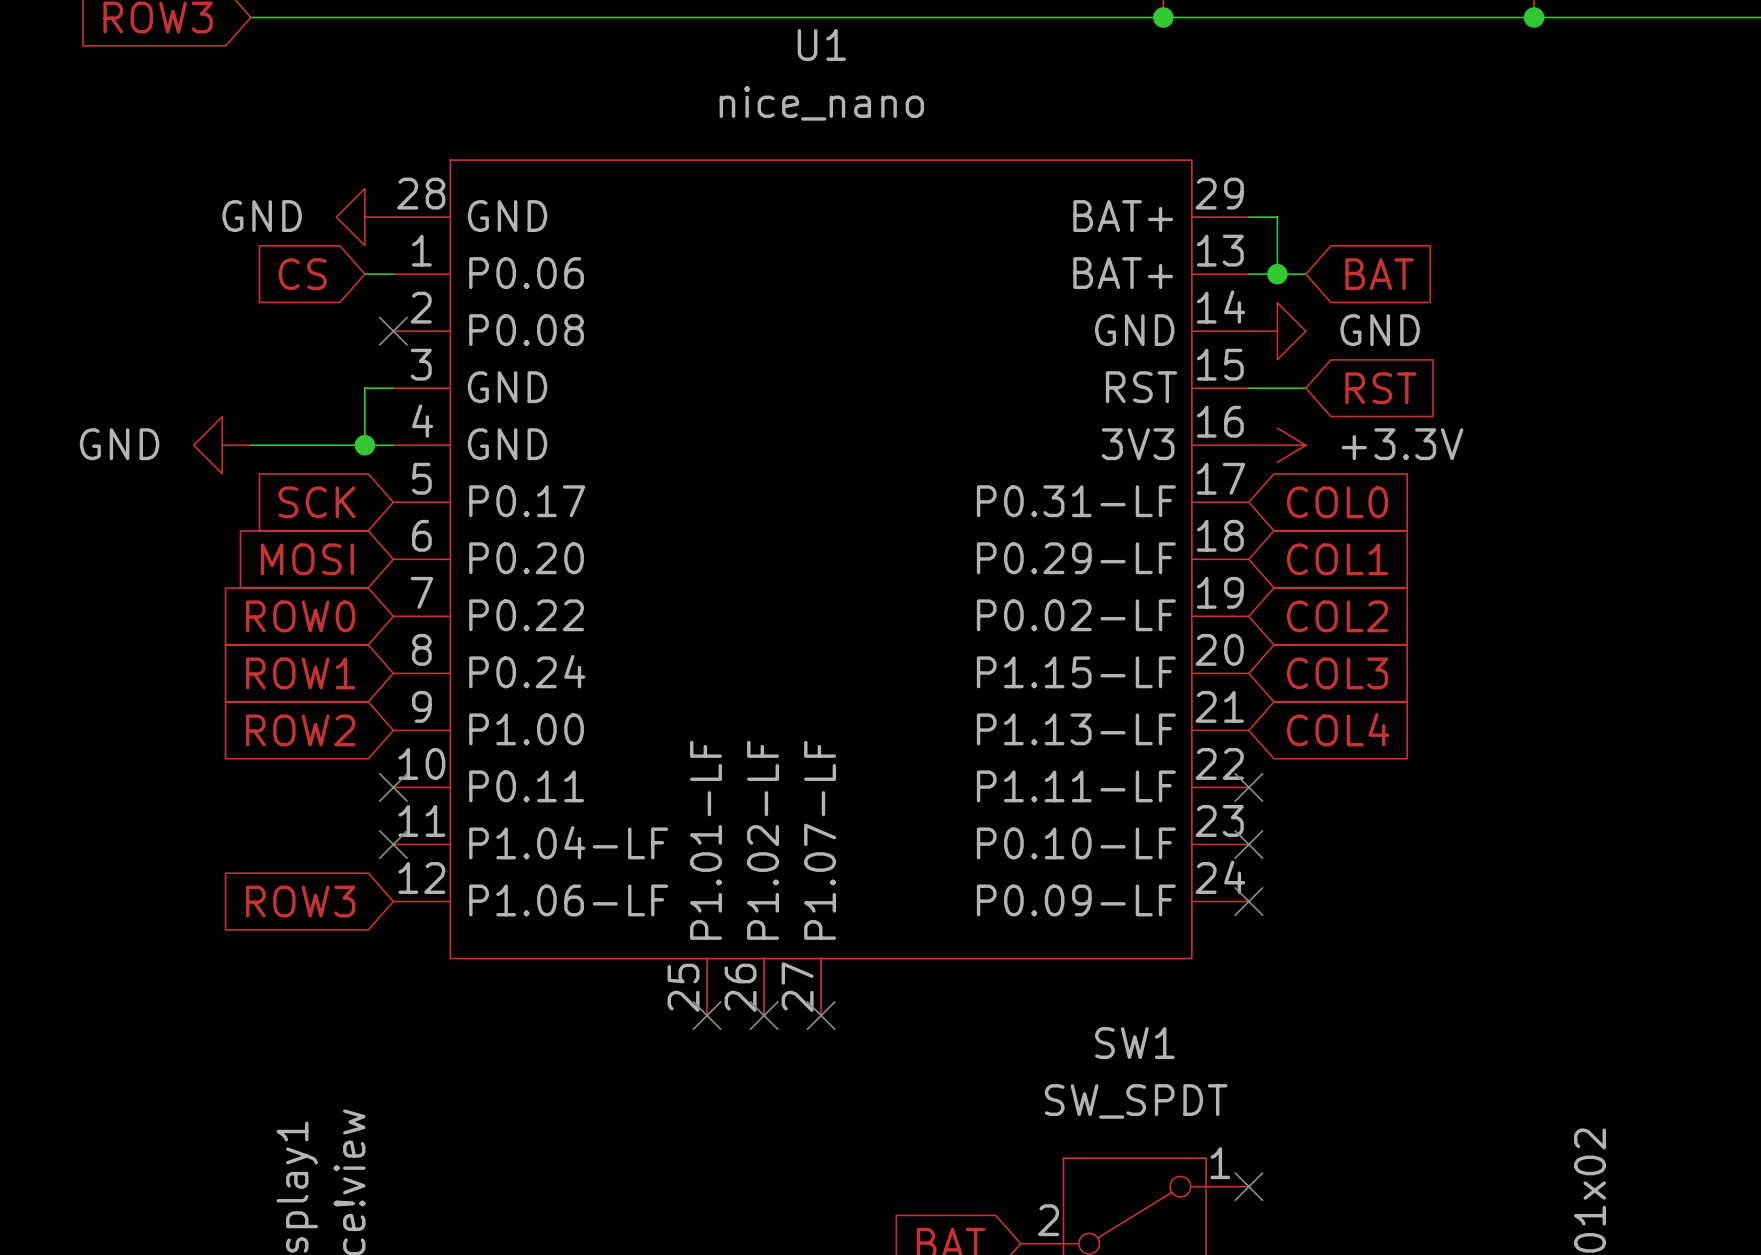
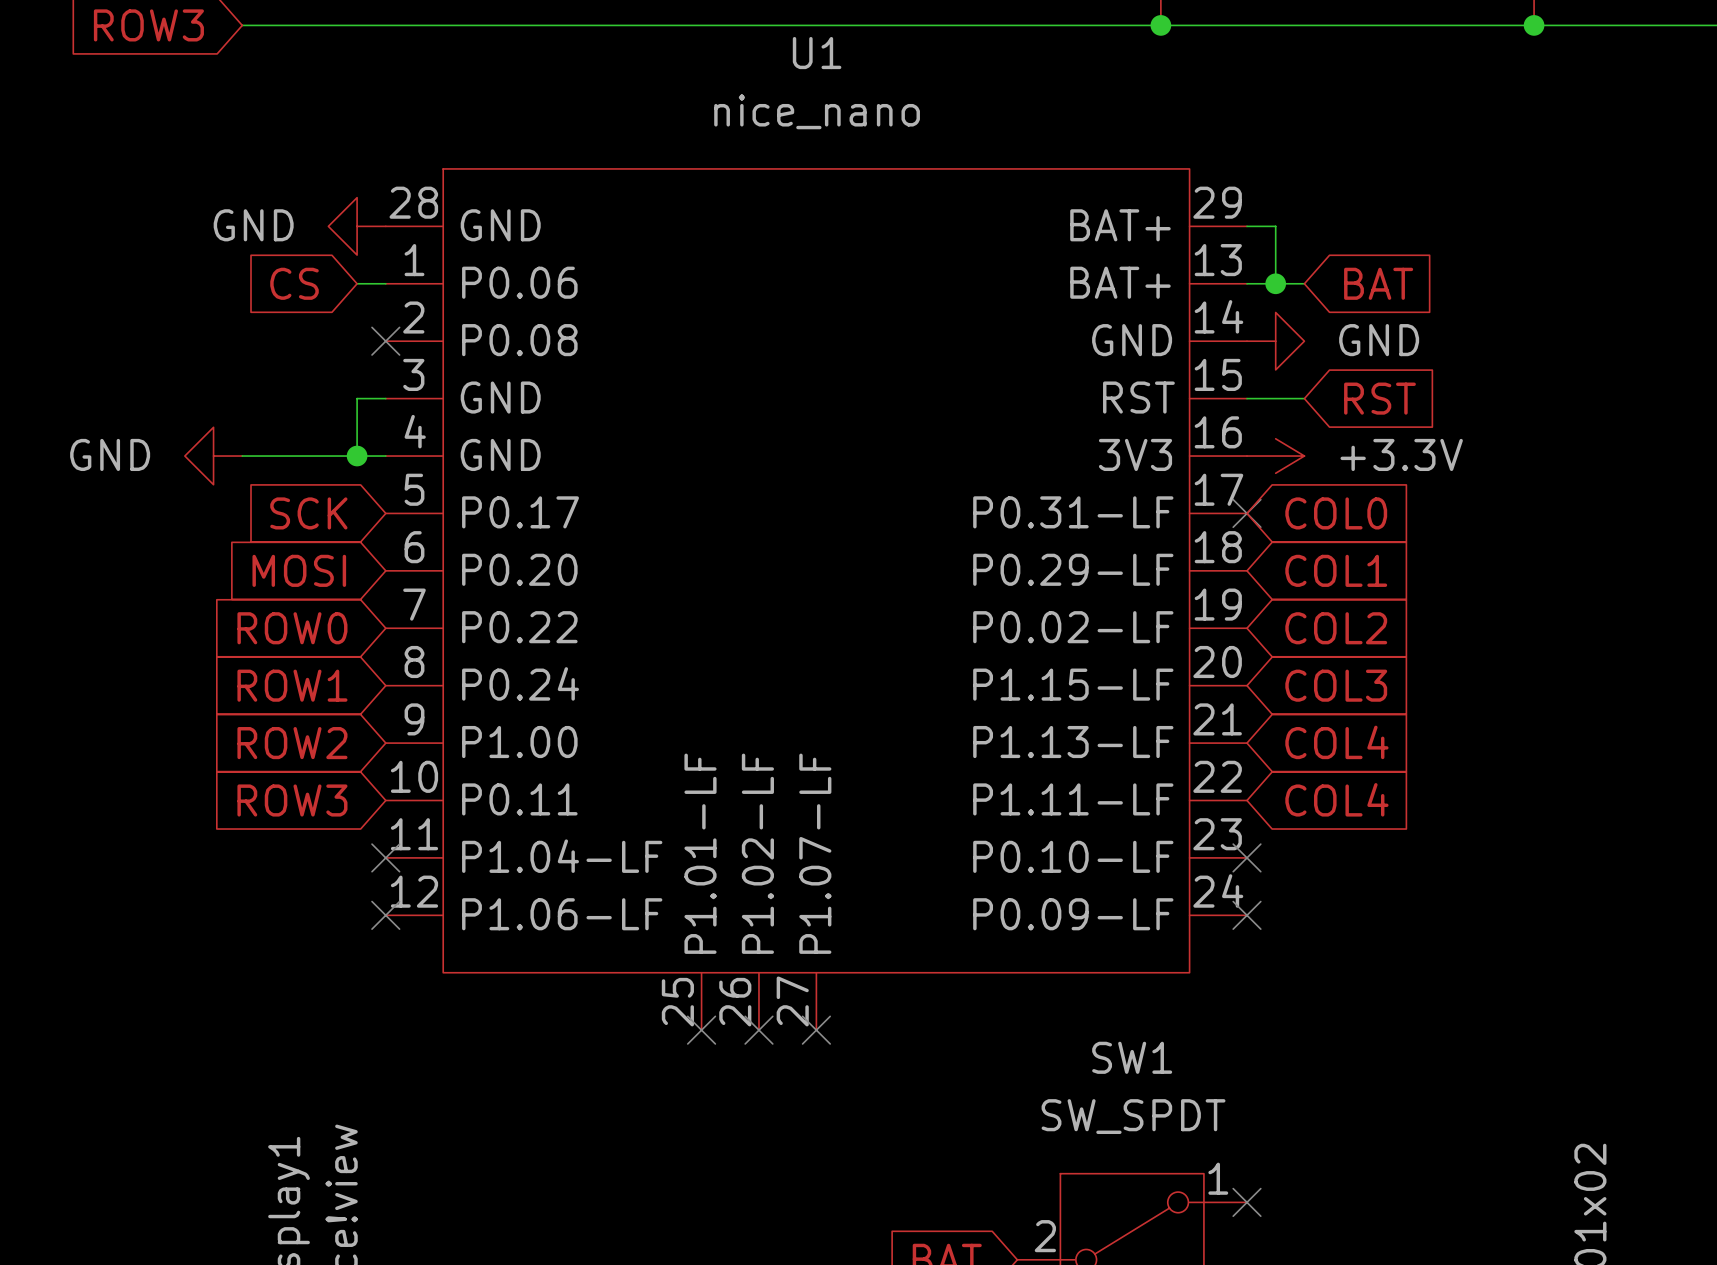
no-connect mark: none -> (1246, 513)
global label: none -> COL4 (1336, 799)
no-connect mark position: (393, 787) -> (385, 915)
no-connect mark: (1248, 787) -> none
global label position: ROW3 (300, 901) -> ROW3 (292, 800)

